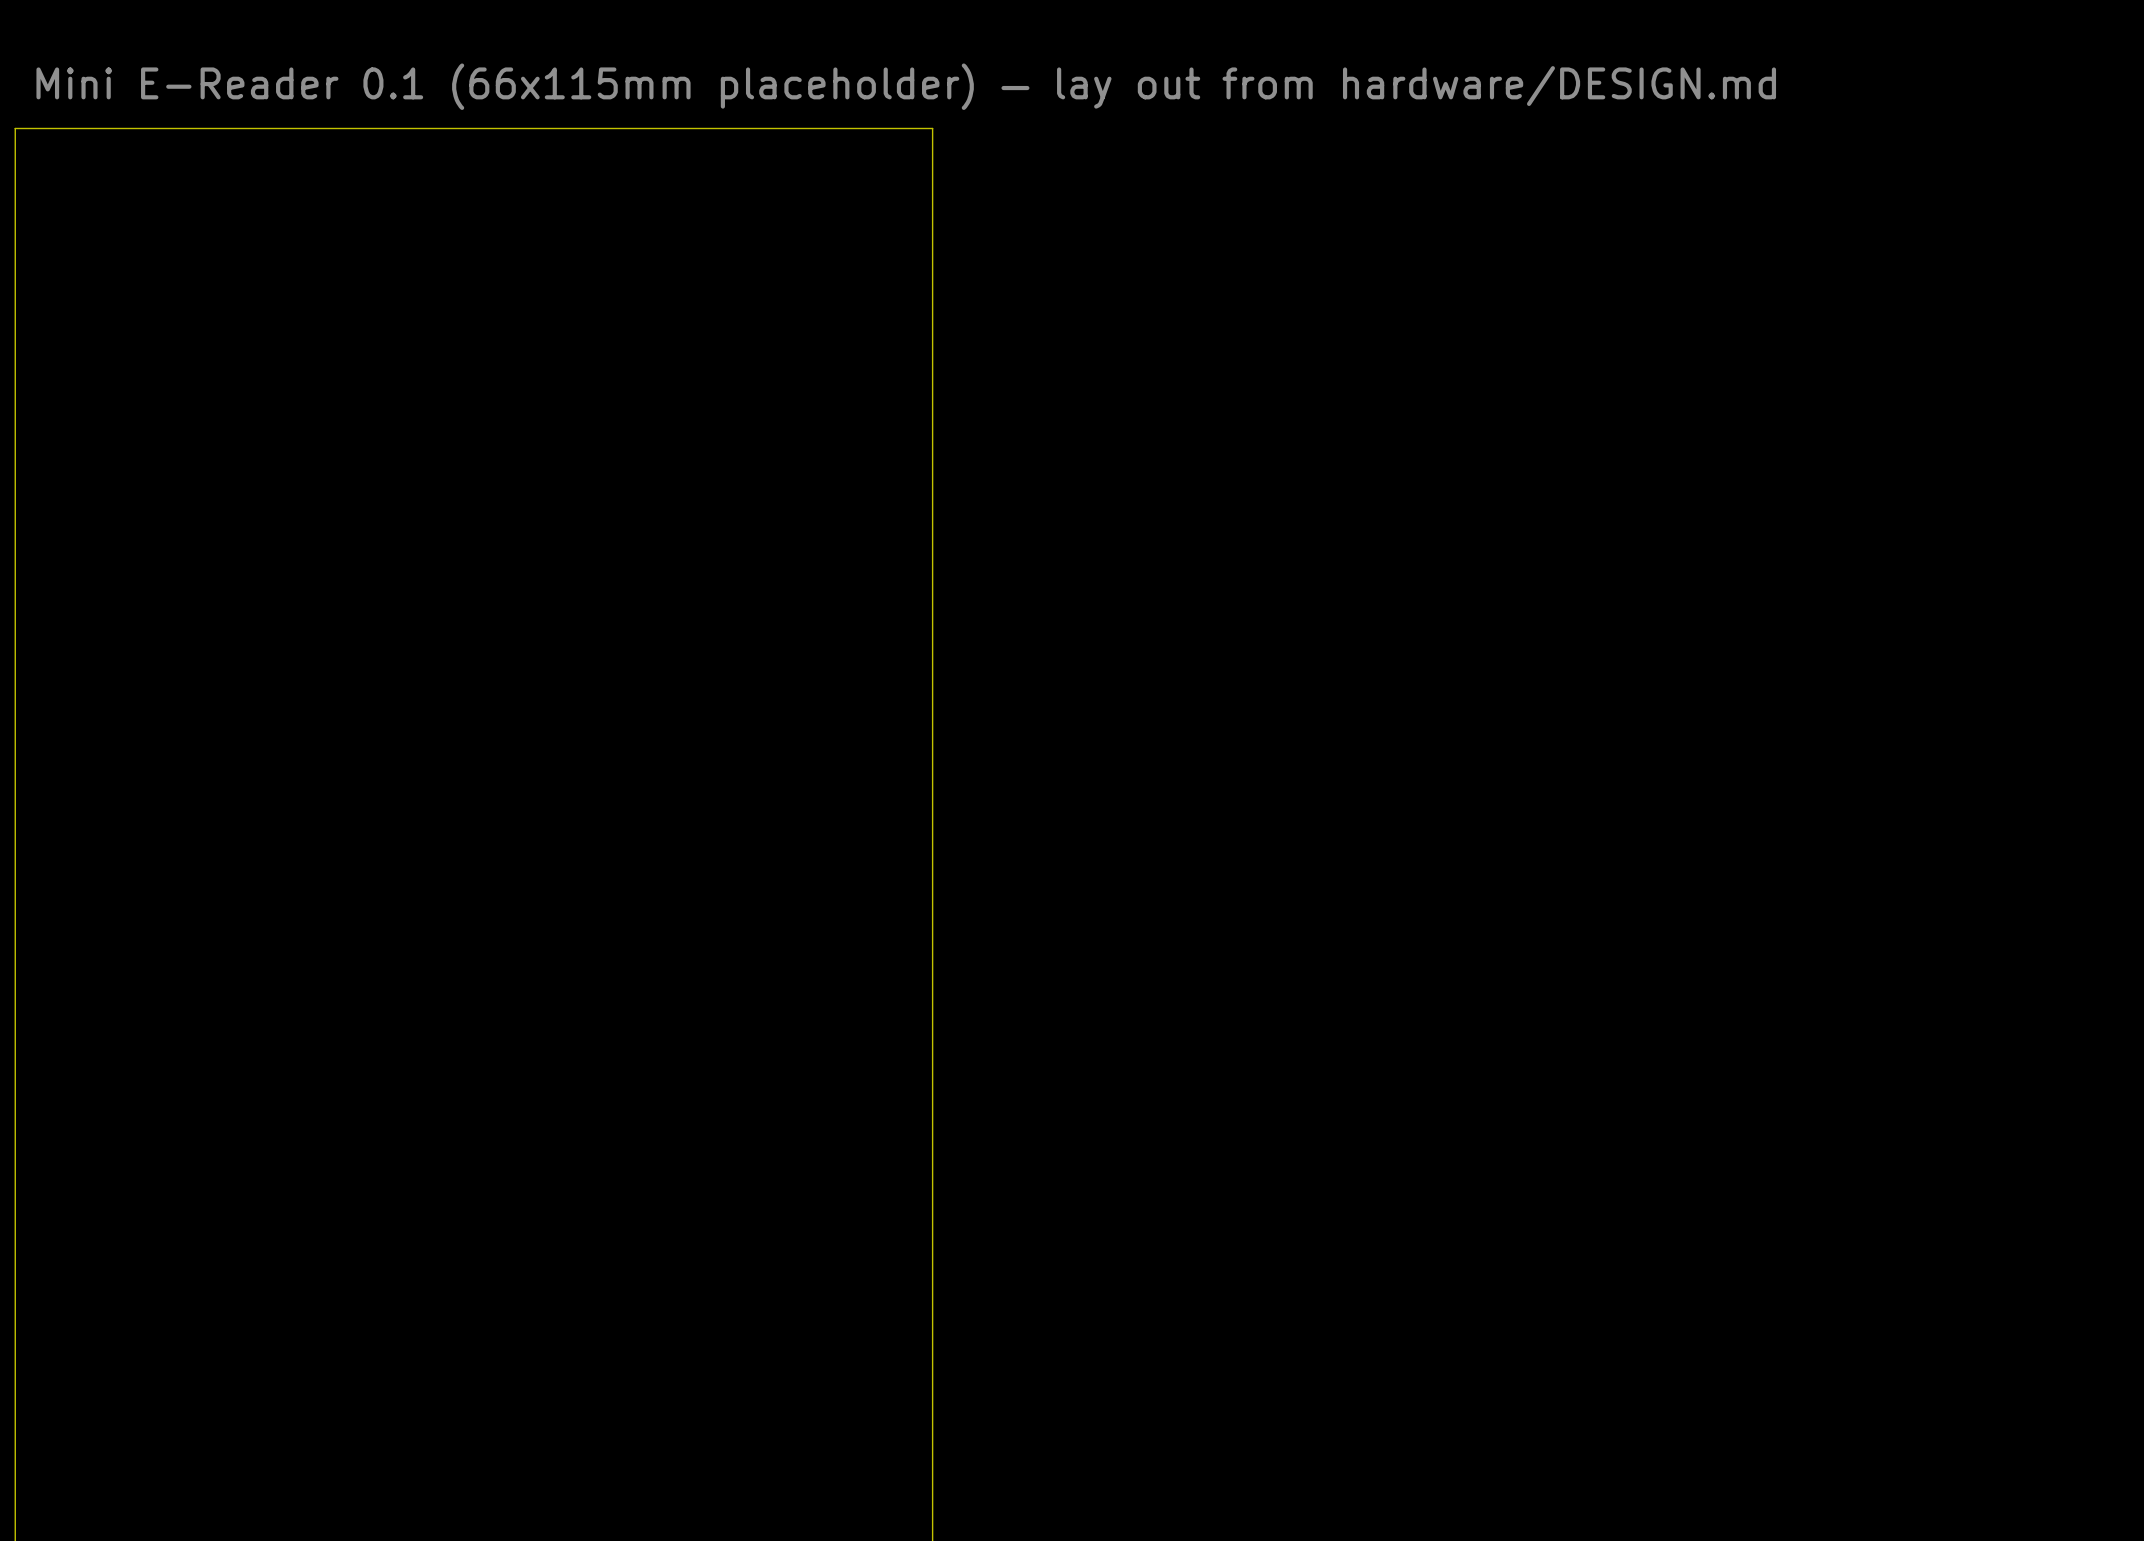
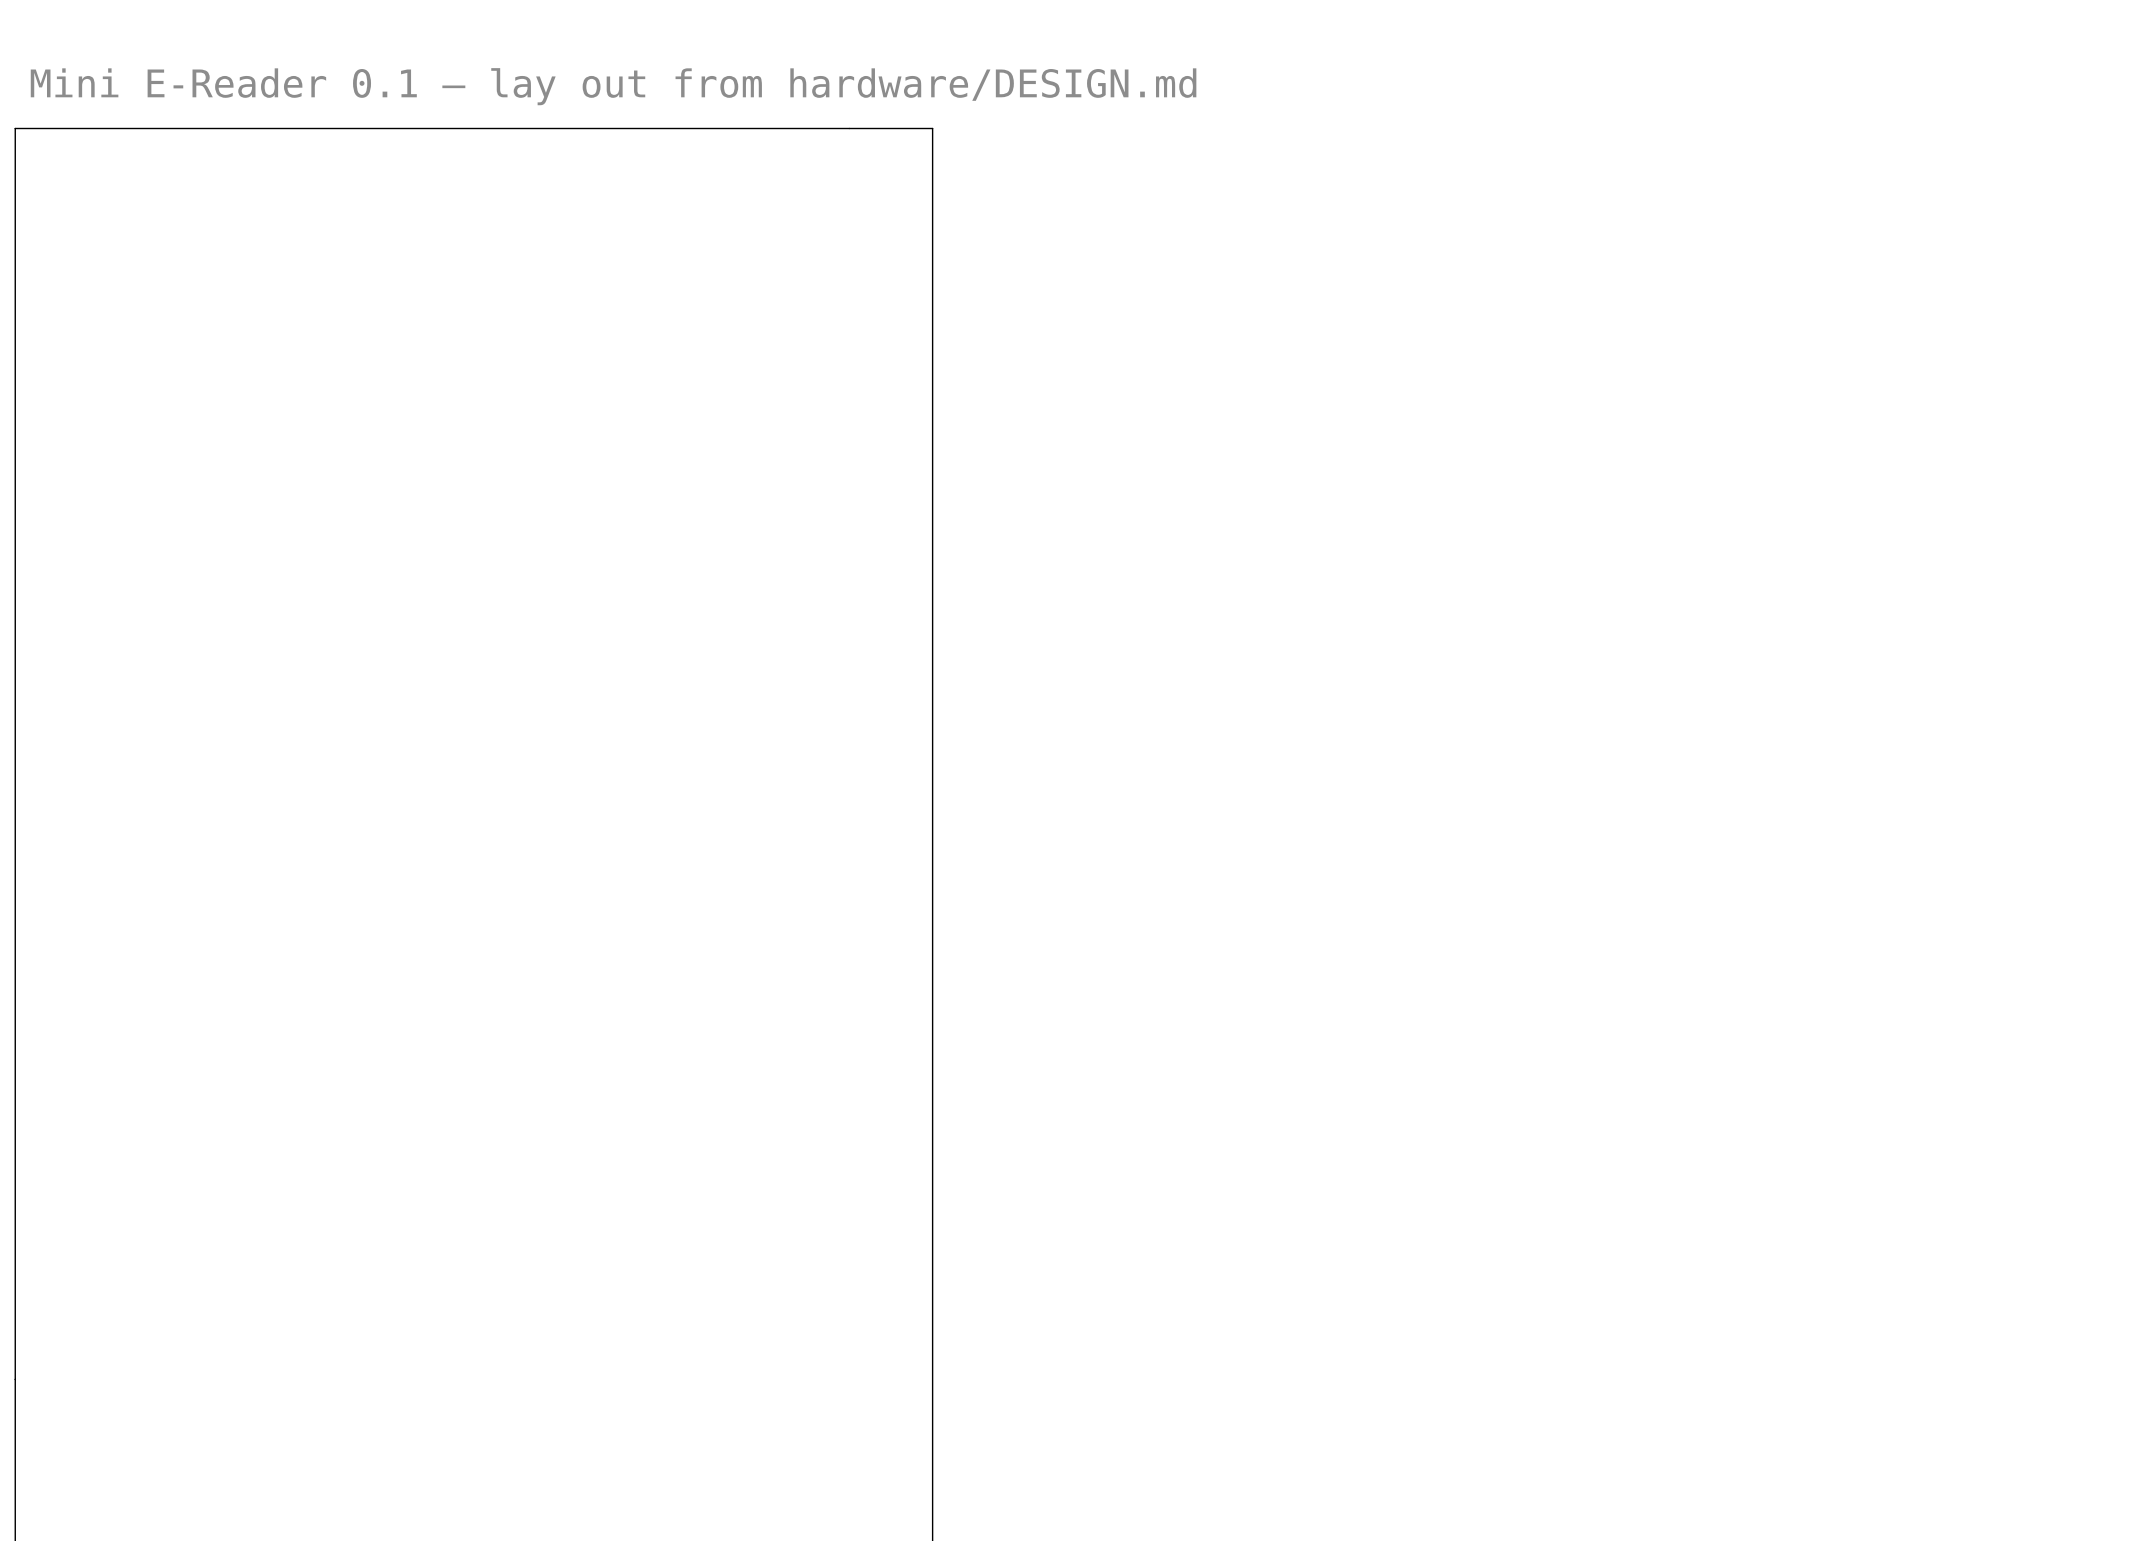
text: Mini E-Reader 0.1 (66x115mm placeholder) — lay out from hardware/DESIGN.md (906, 86) -> Mini E-Reader 0.1 — lay out from hardware/DESIGN.md (613, 86)

